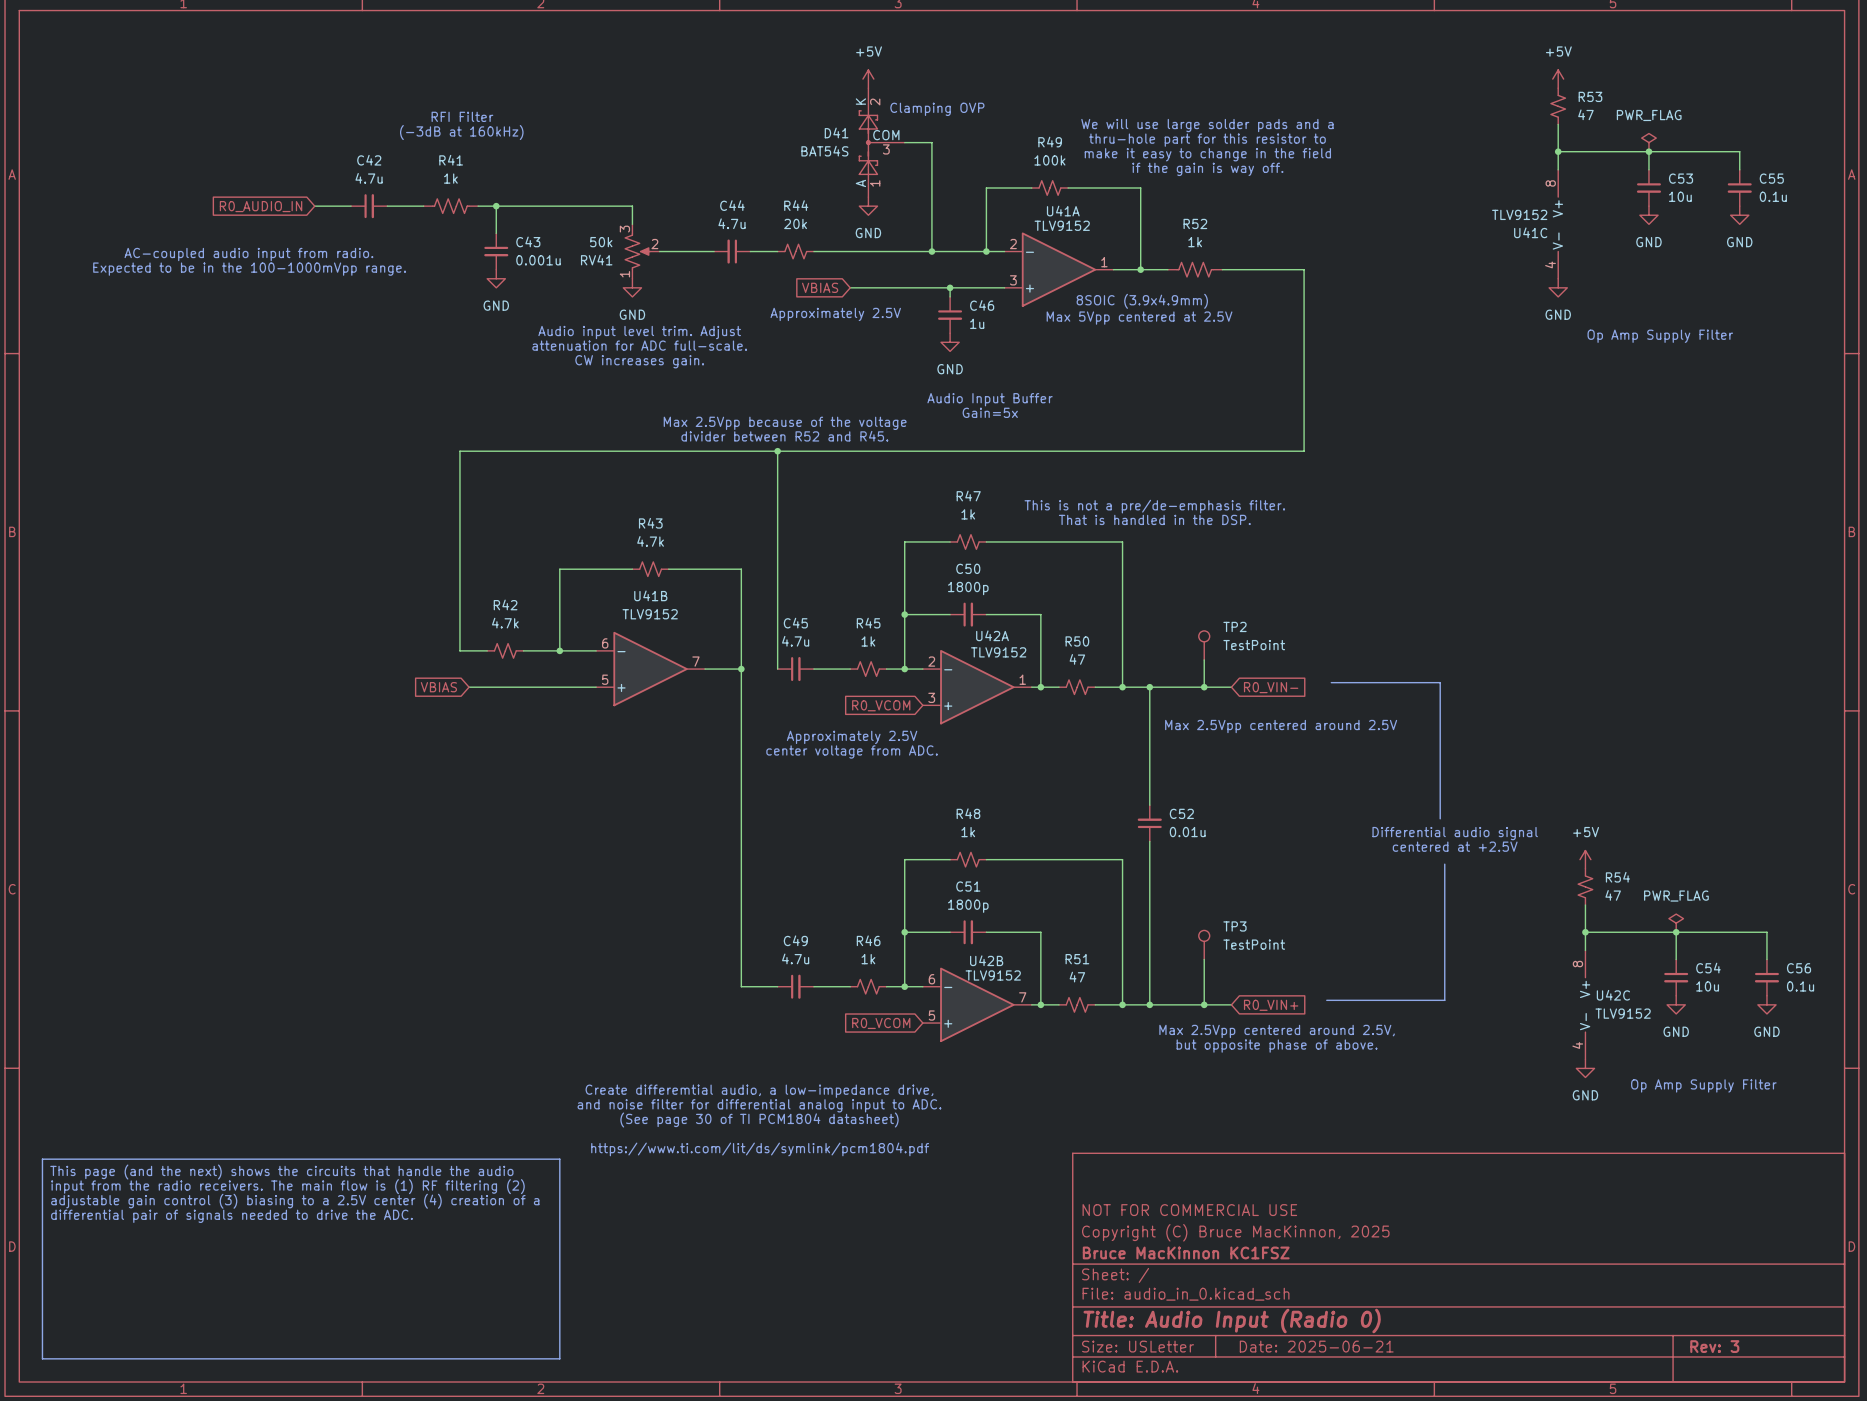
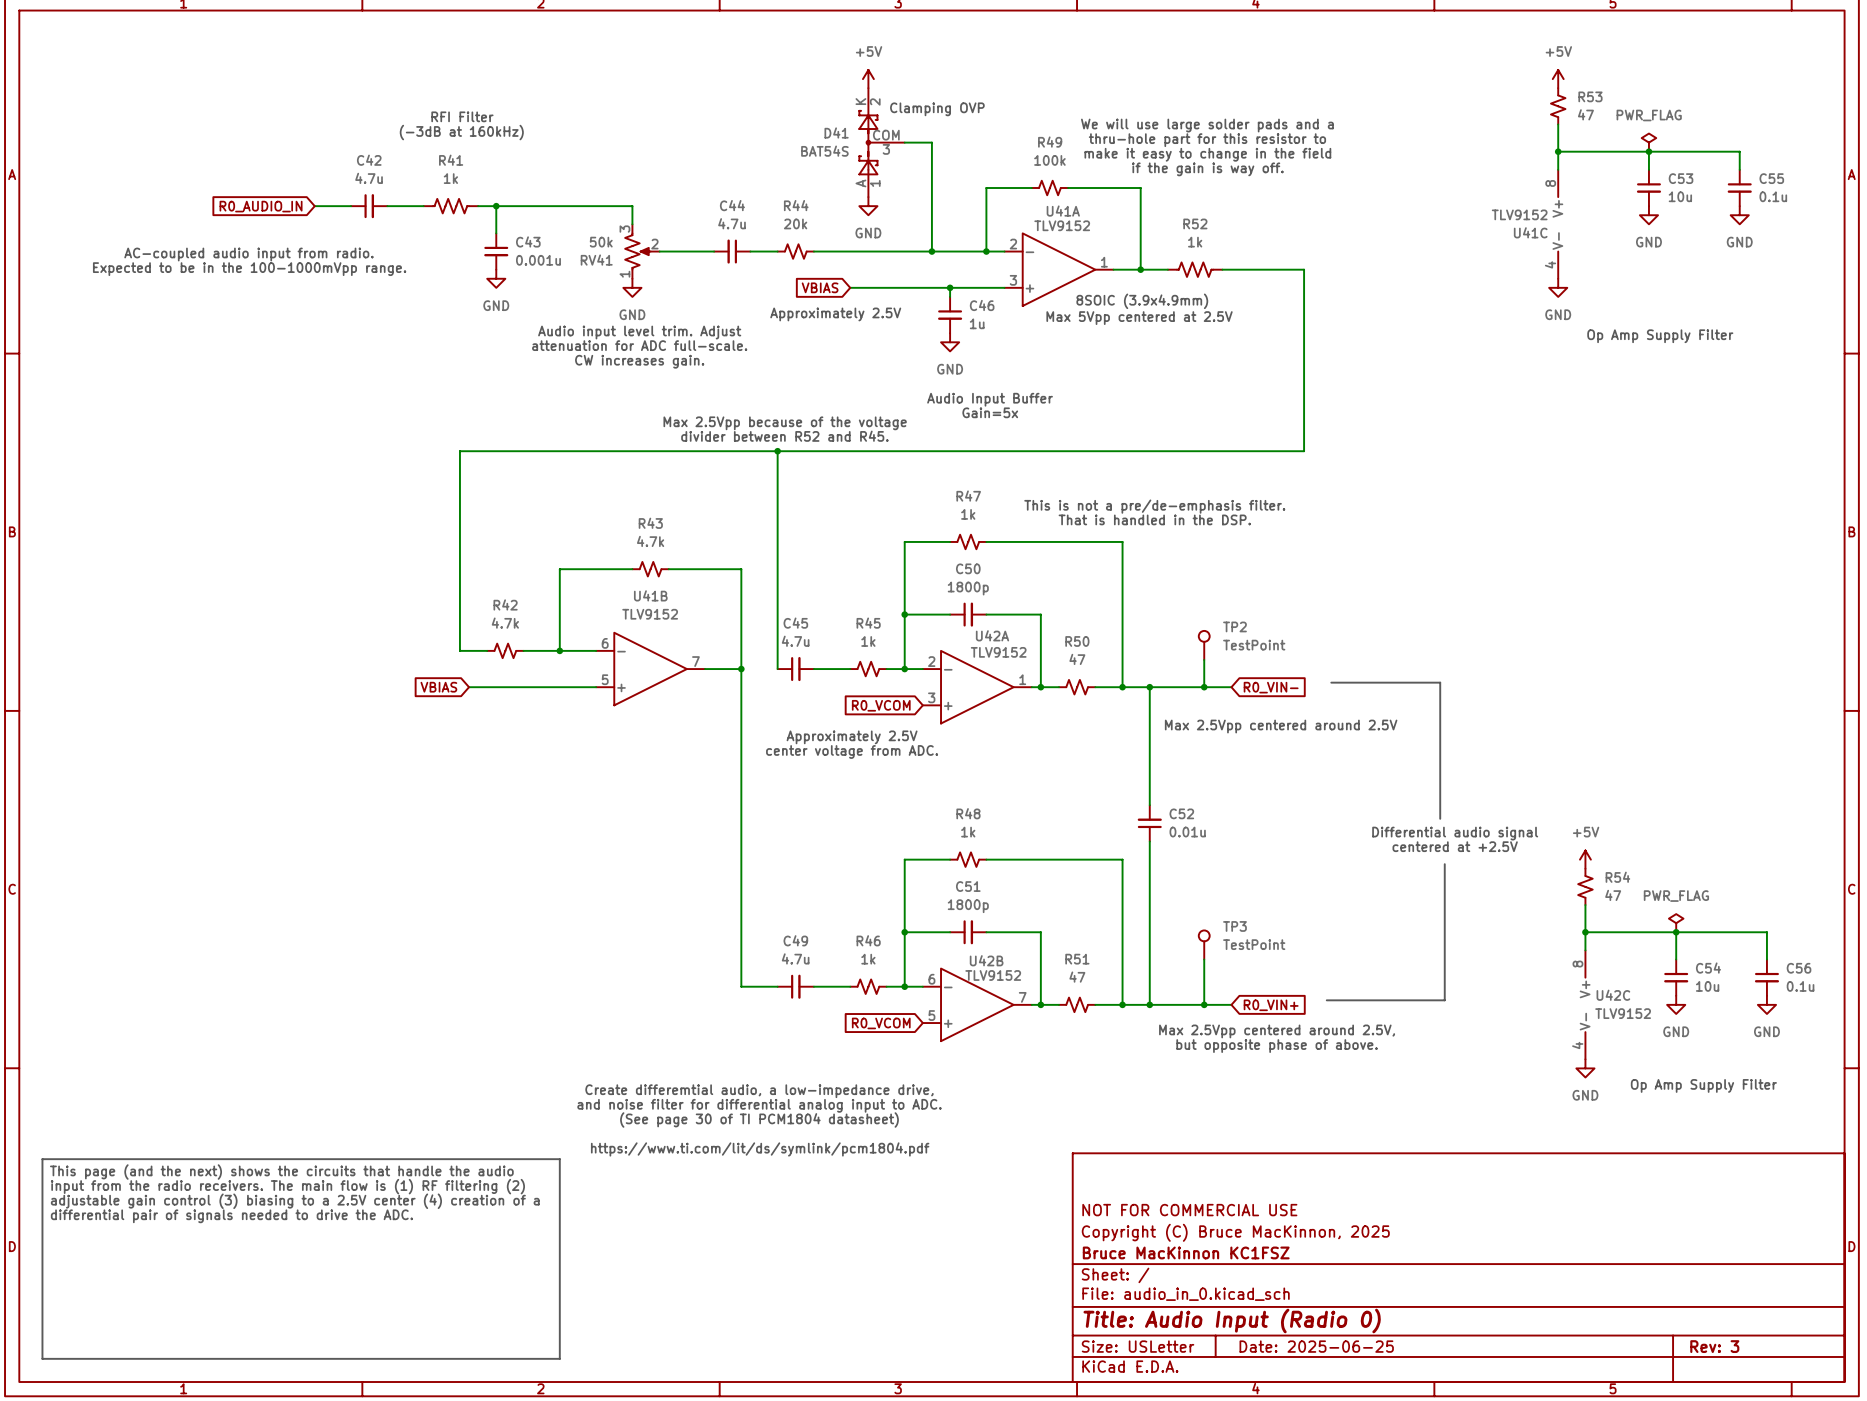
title block: Date: 2025-06-21 (1316, 1346) -> Date: 2025-06-25 (1316, 1346)

